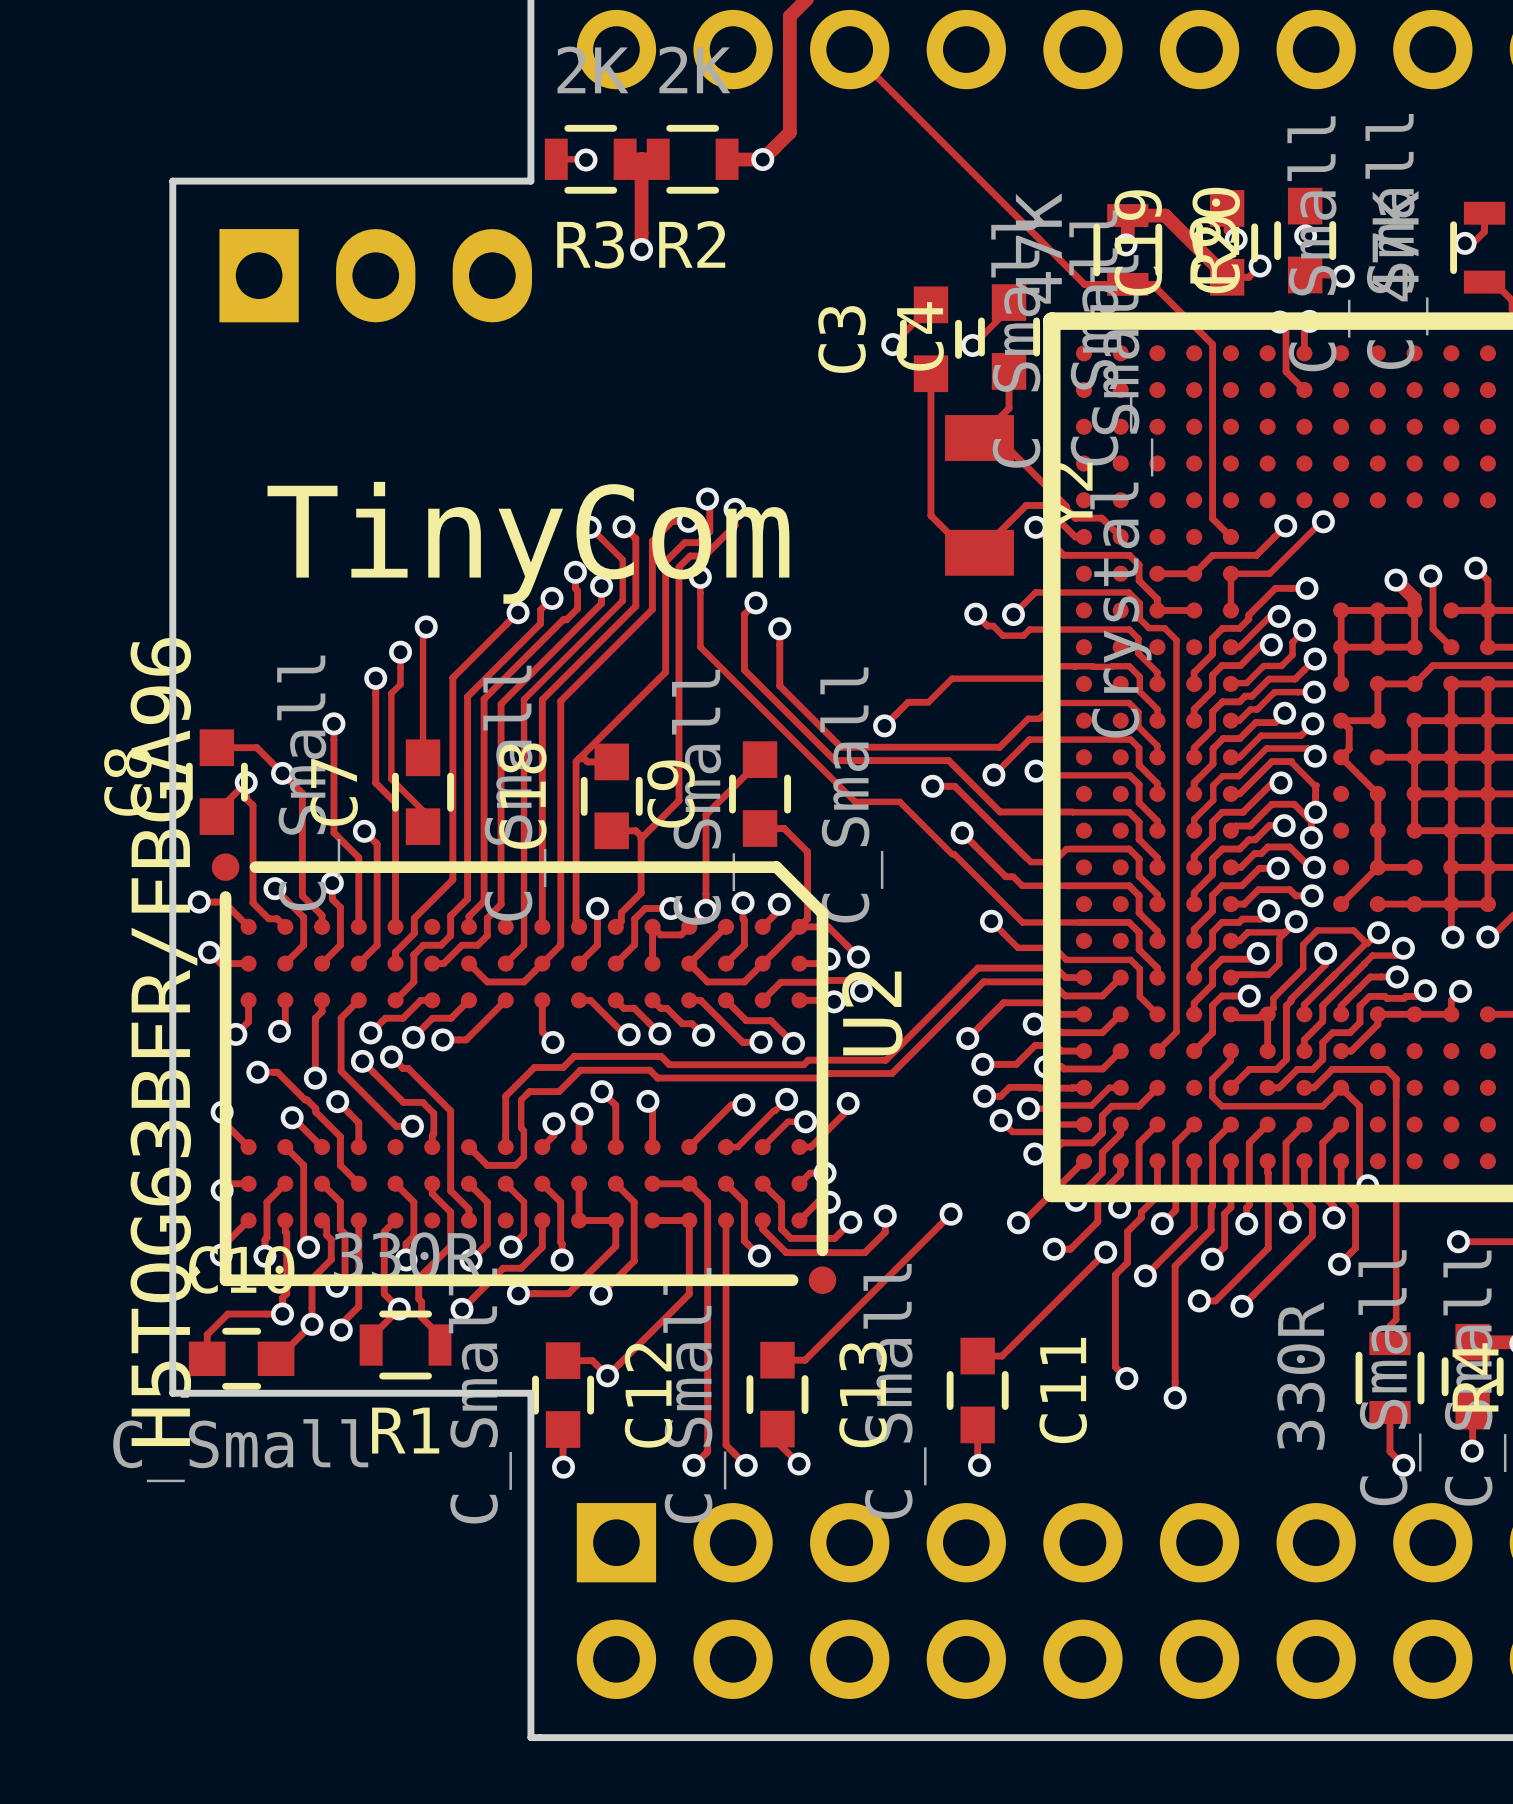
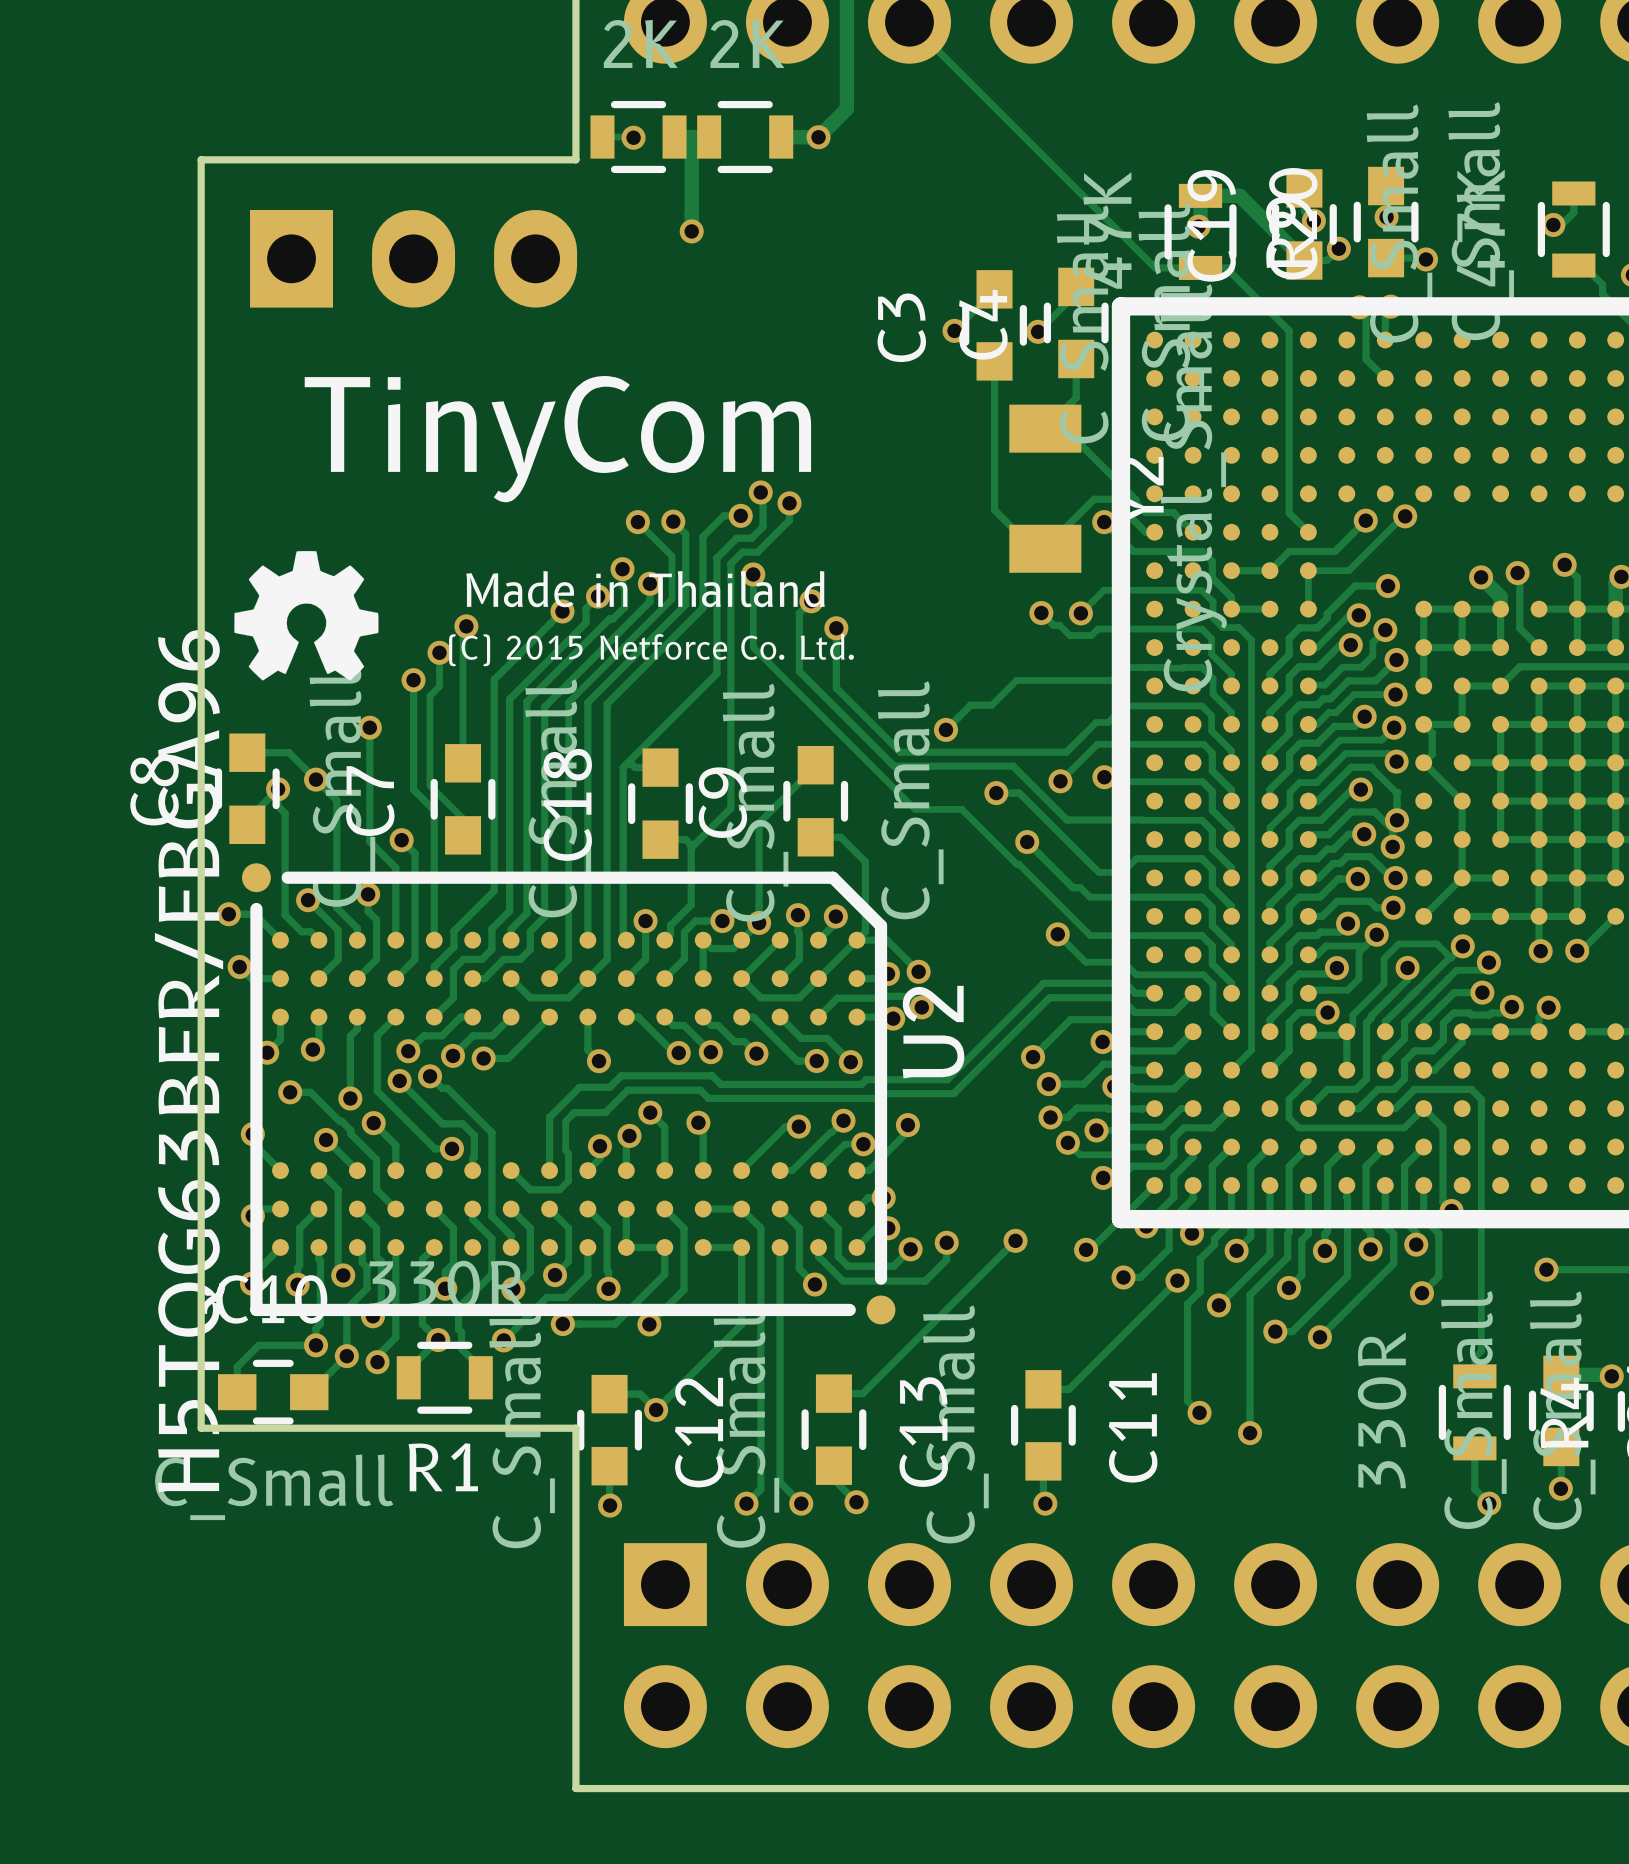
R3 name: R3 (590, 244) -> none
R2 name: R2 (692, 244) -> none
text position: TinyCom (528, 542) -> TinyCom (557, 439)
drawing: none -> [234, 551, 379, 681]
text: none -> Made in Thailand (645, 589)
text: none -> (C) 2015 Netforce Co. Ltd. (651, 650)

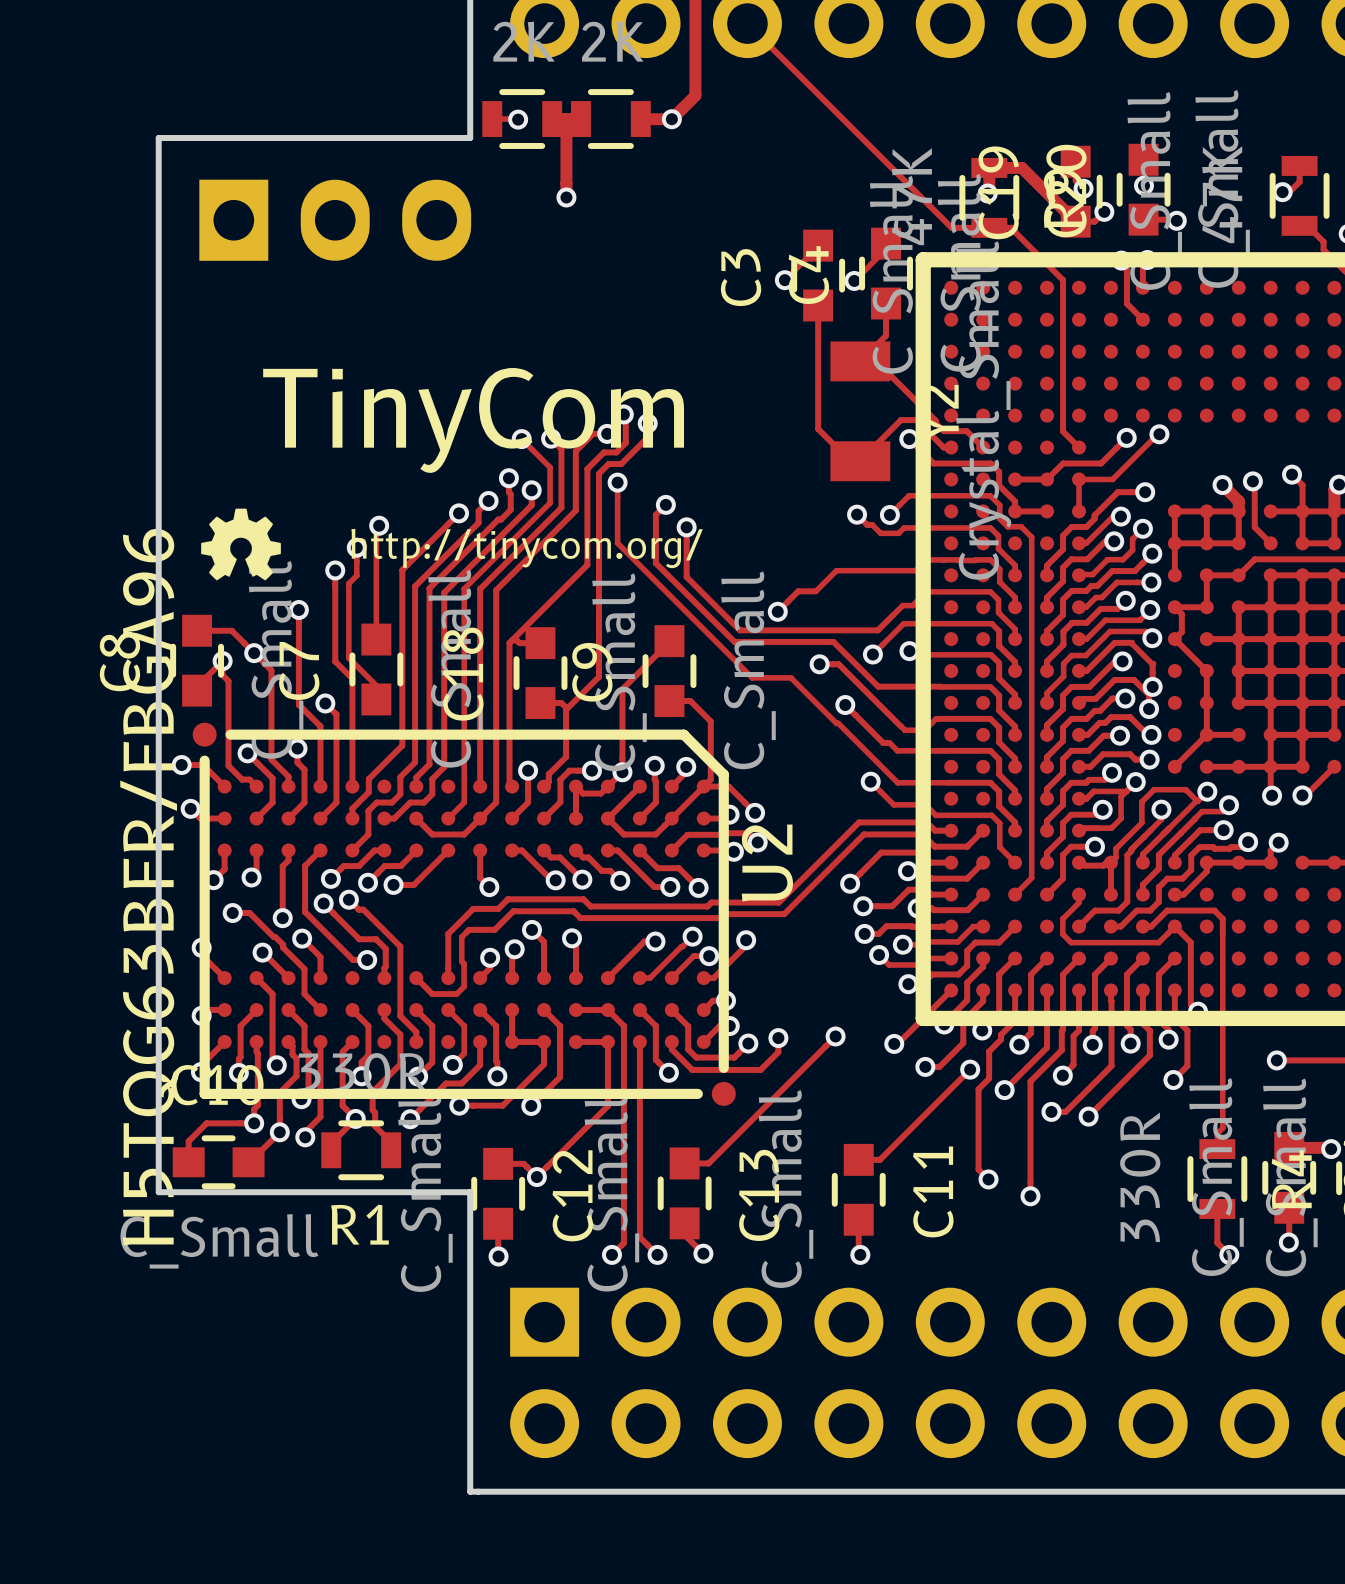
text position: TinyCom (557, 439) -> TinyCom (473, 420)
drawing shape: [234, 551, 379, 681] -> [201, 508, 281, 581]
text: Made in Thailand (645, 589) -> none
text: (C) 2015 Netforce Co. Ltd. (651, 650) -> http://tinycom.org/ (527, 548)

